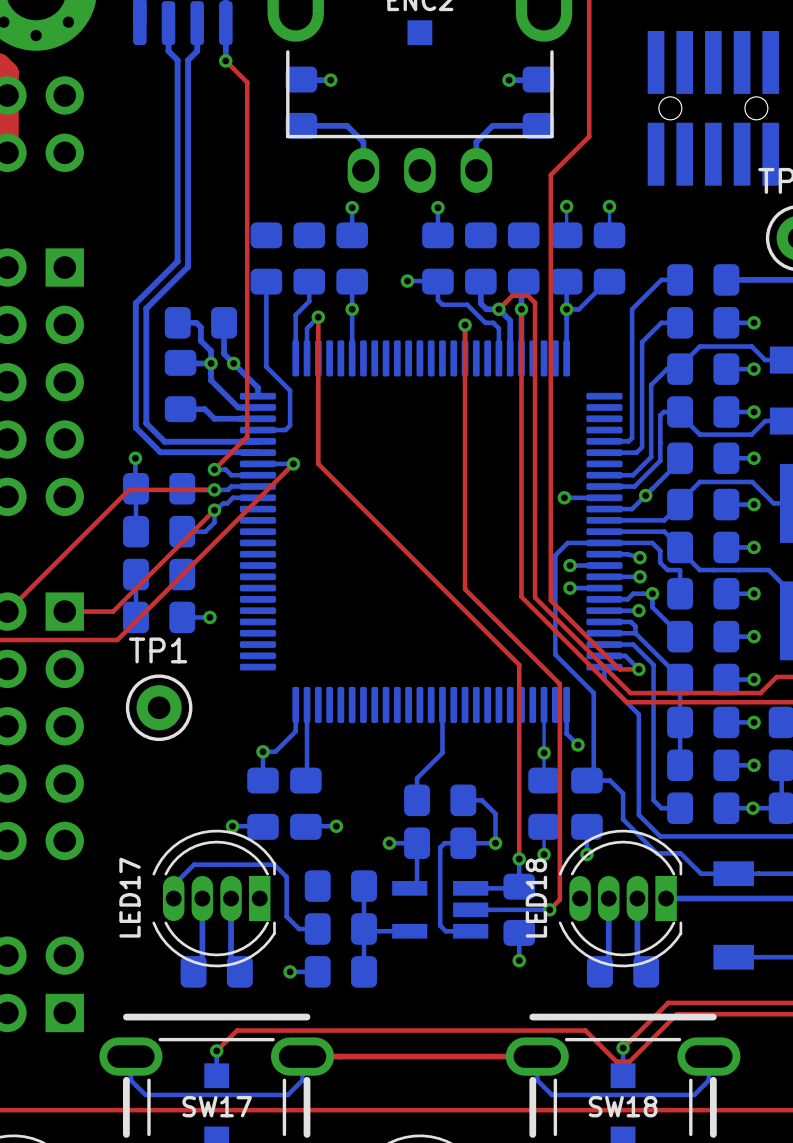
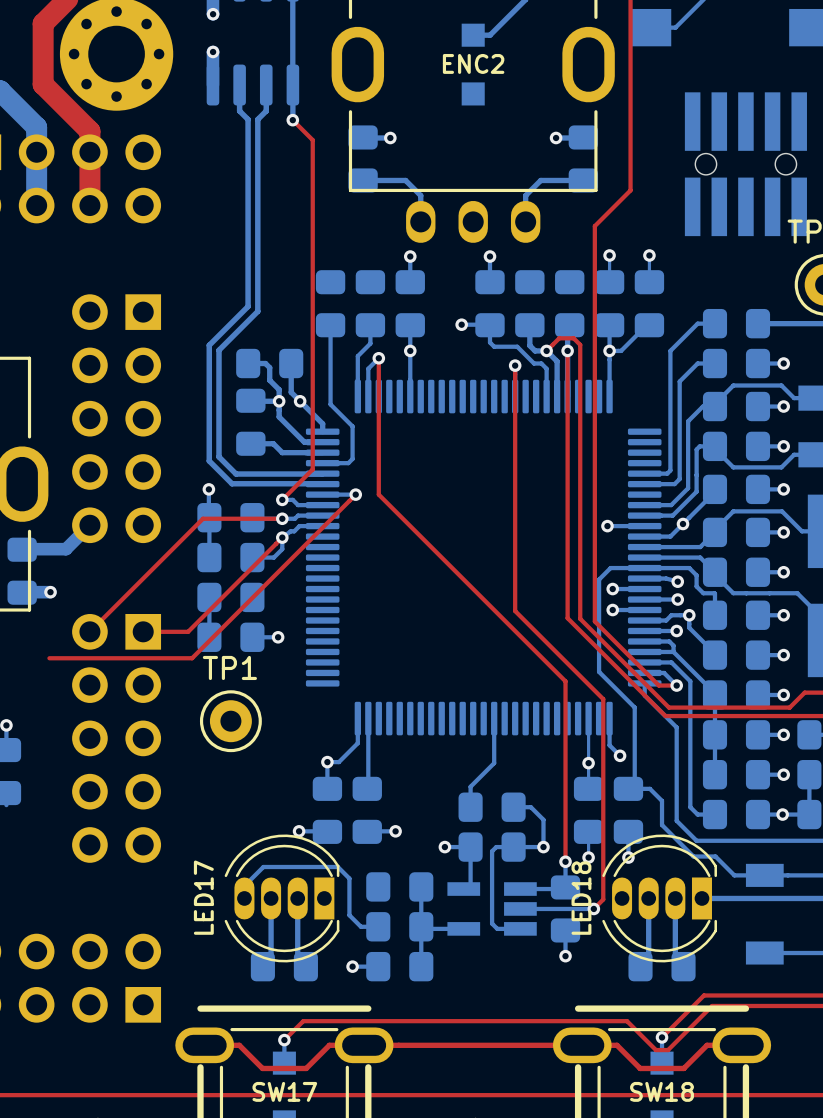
bottom track: (130, 1056) (130, 1080) (145, 1094) (287, 1094) (302, 1080) (302, 1056) -> none
top track: none -> (204, 1045) (239, 1045) (262, 1068) (306, 1068) (329, 1045) (364, 1045)
bottom track: (537, 1056) (537, 1080) (551, 1094) (694, 1094) (708, 1080) (708, 1056) -> none
top track: none -> (582, 1045) (617, 1045) (640, 1068) (683, 1068) (707, 1045) (741, 1045)

